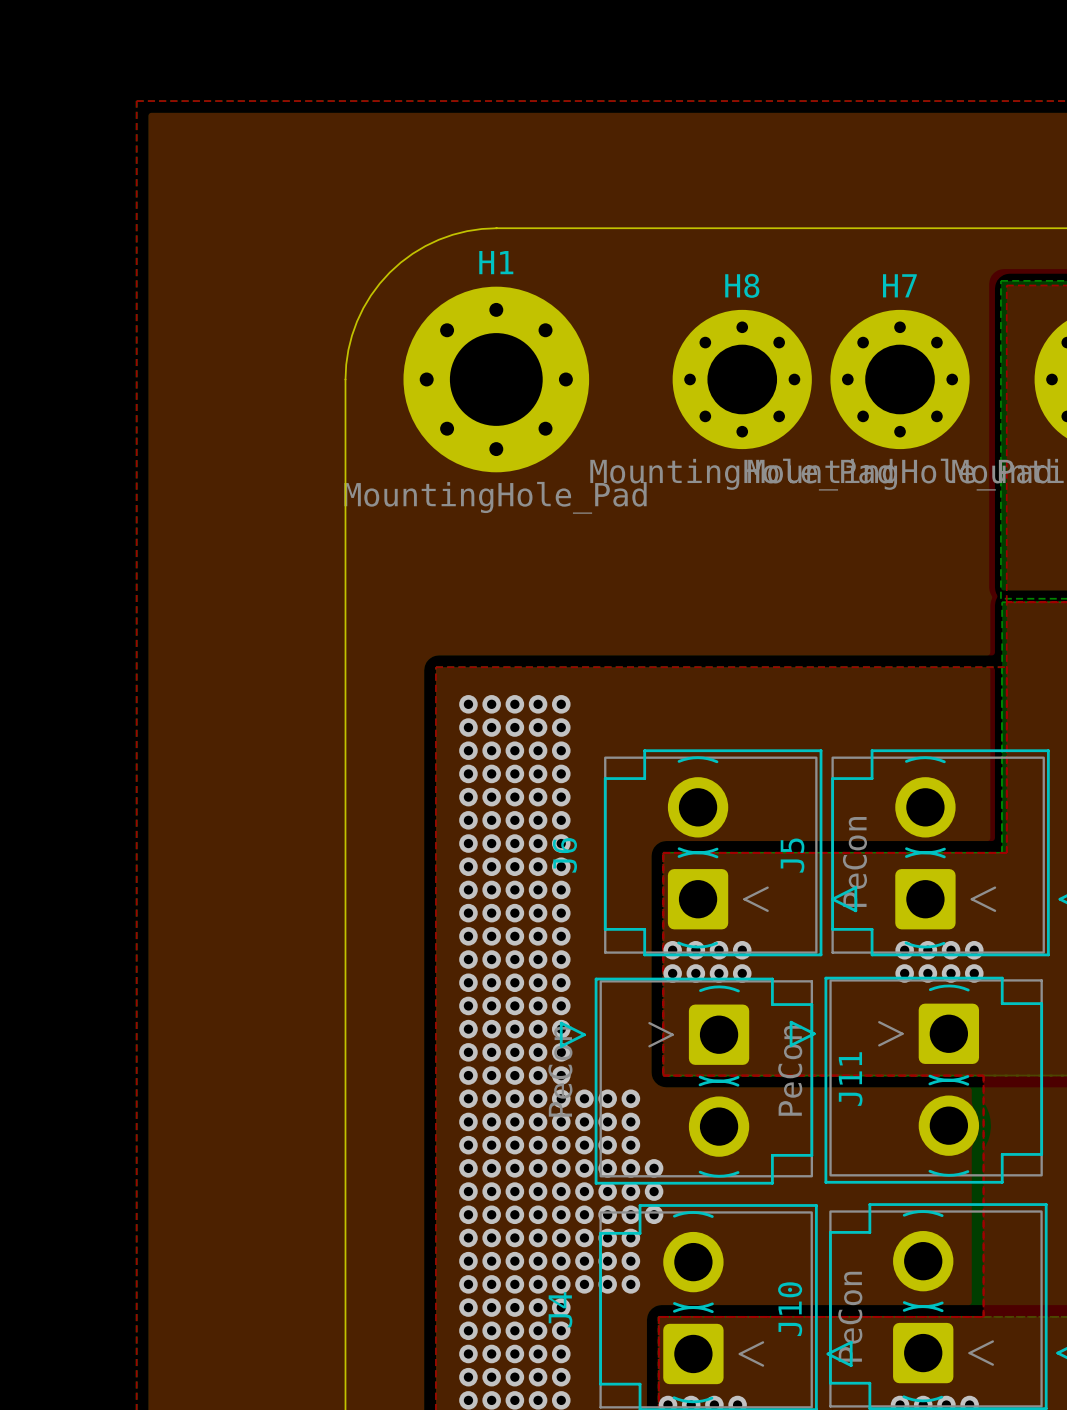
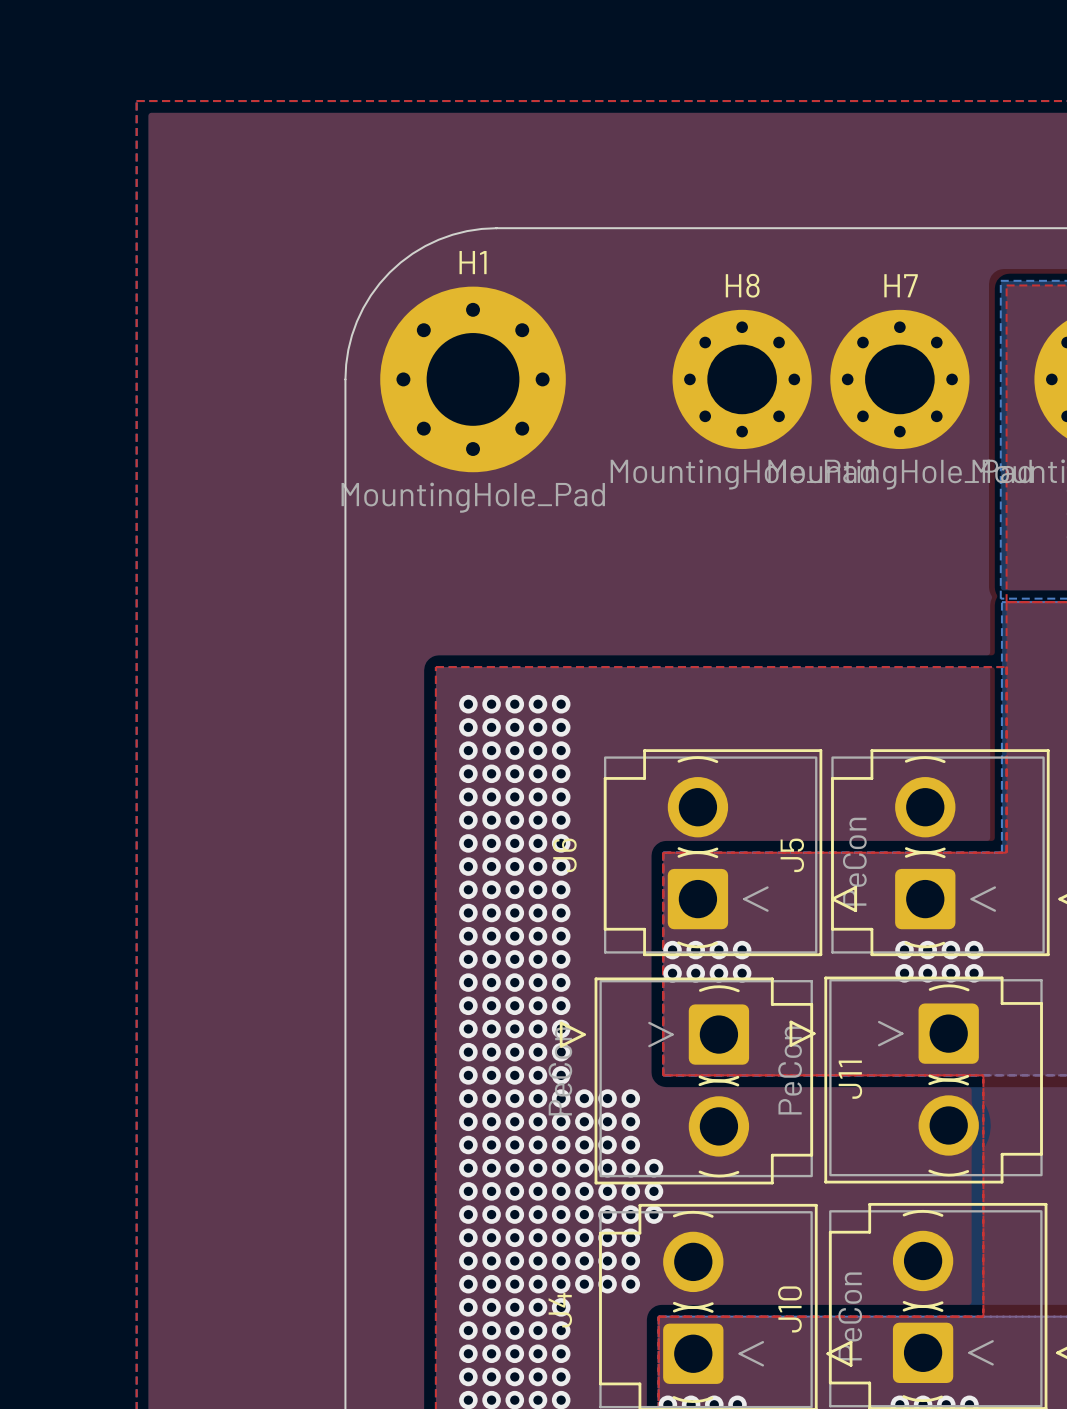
H1 position: (496, 379) -> (473, 379)

